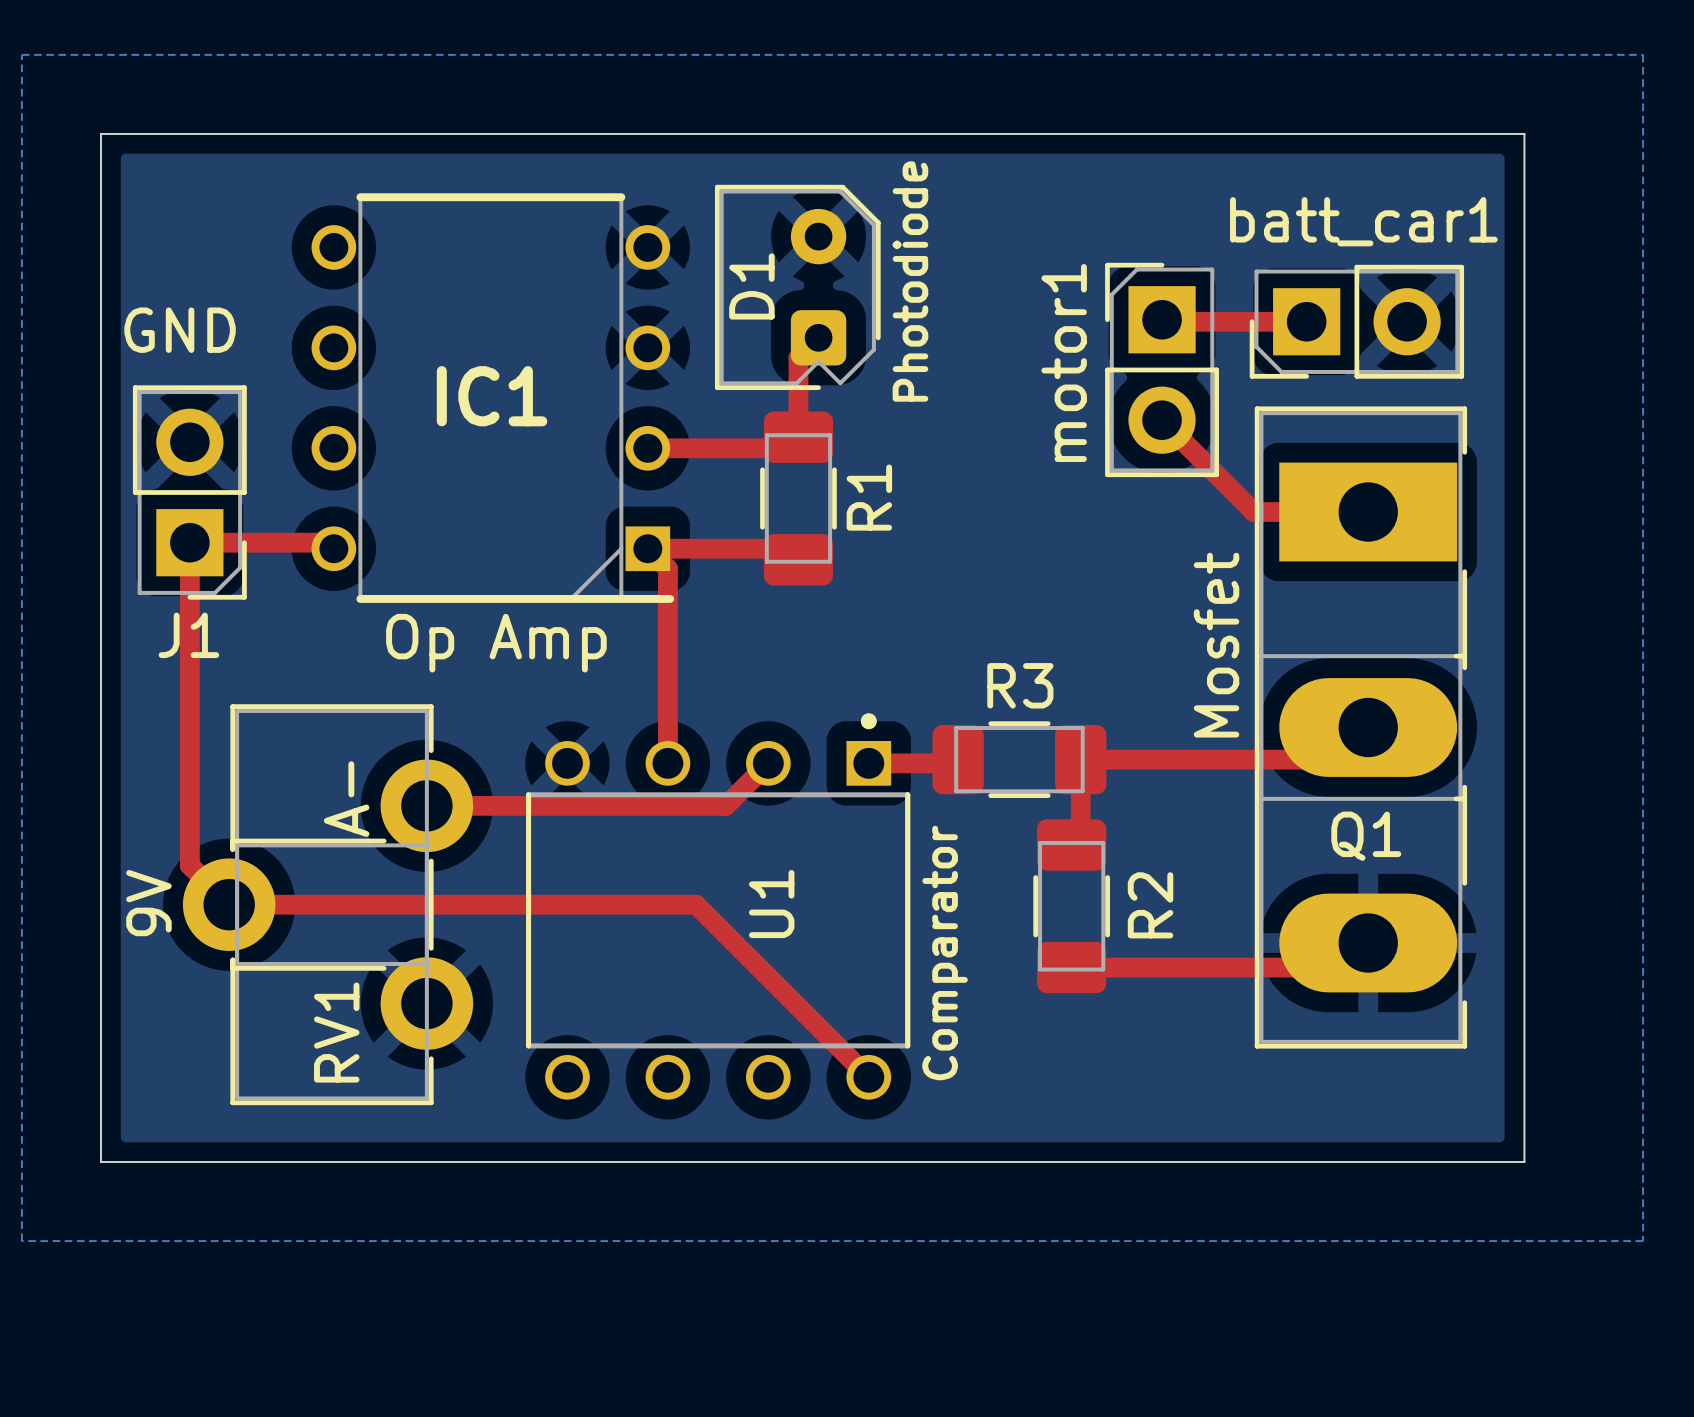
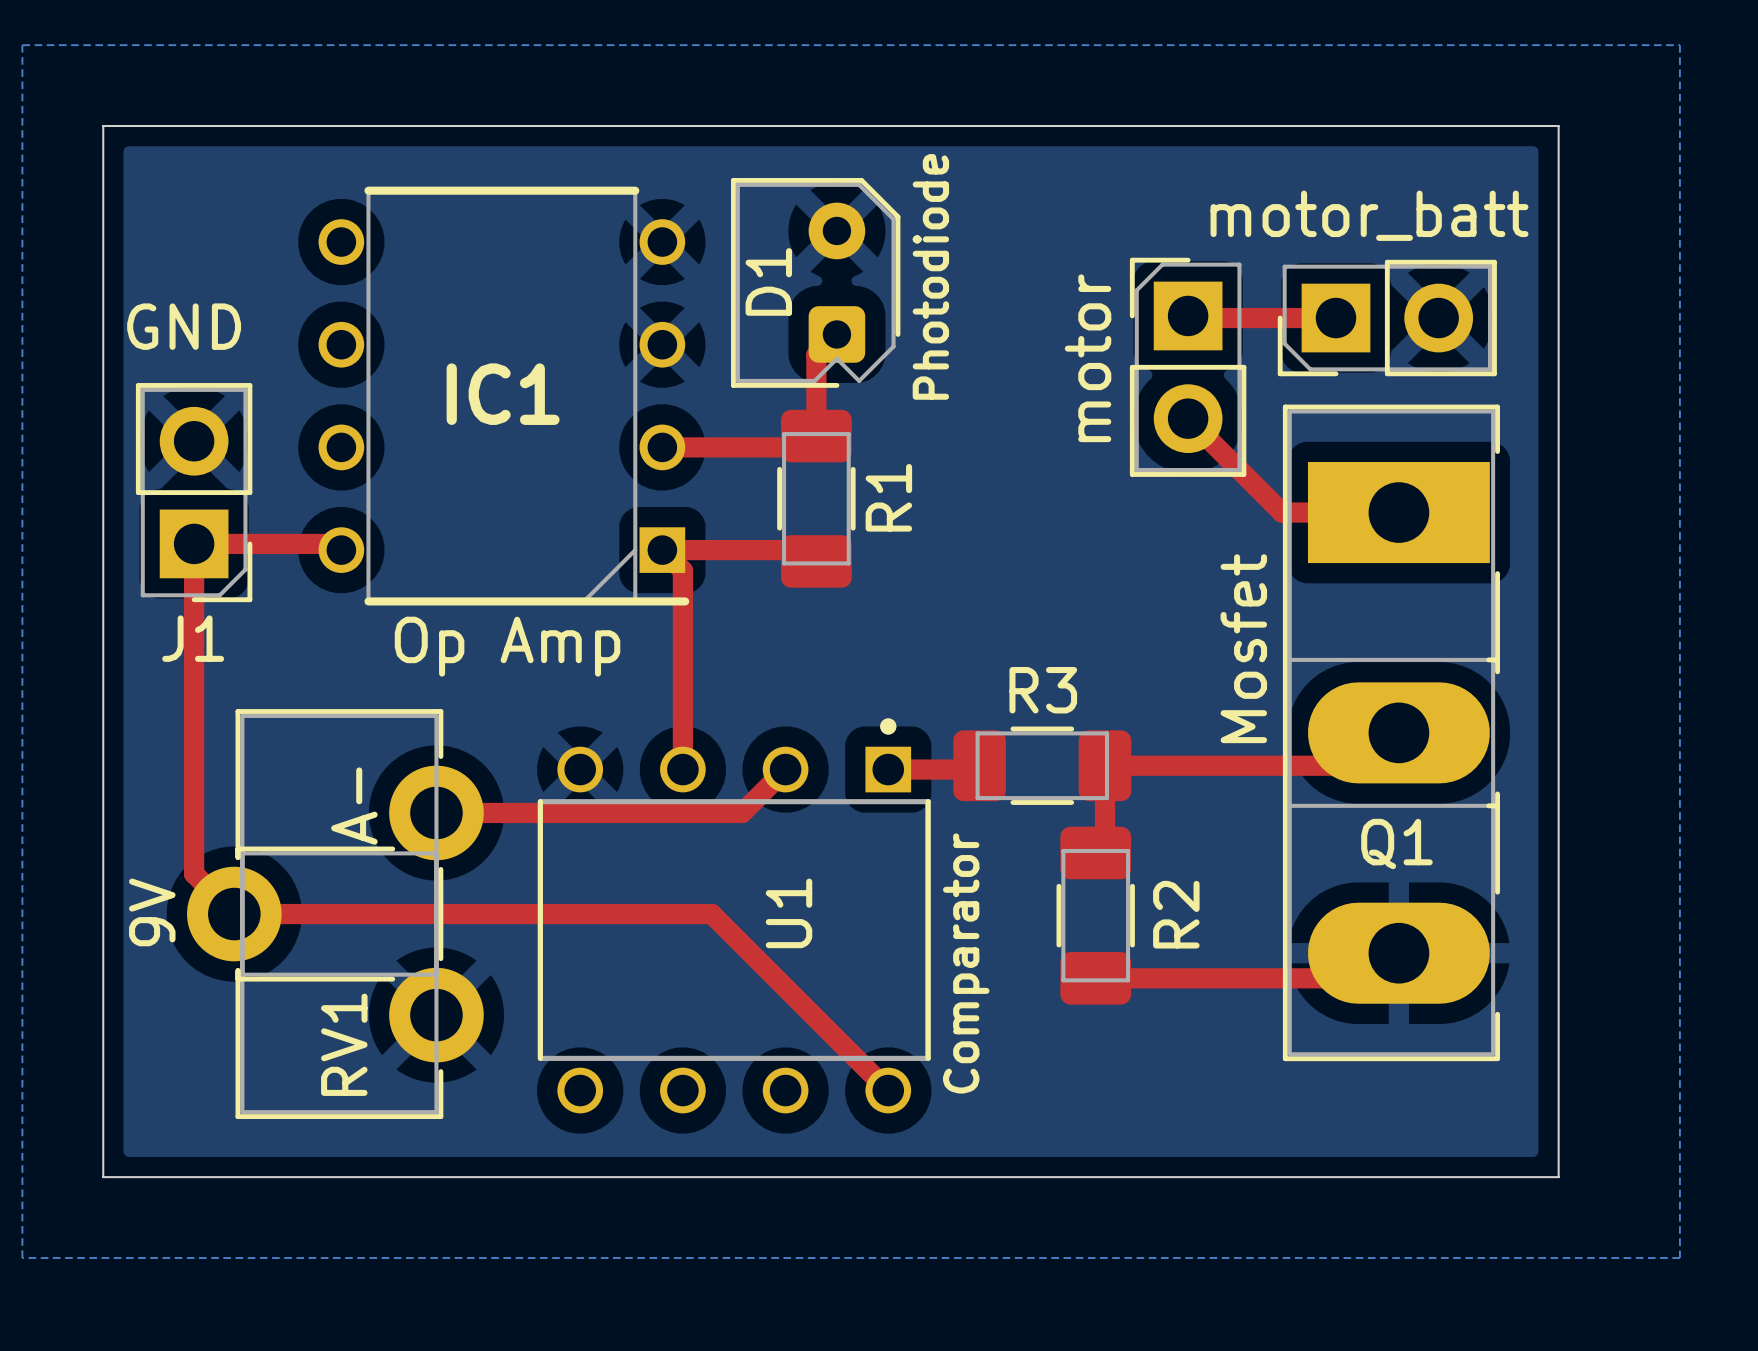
batt_car1 name: batt_car1 (1363, 221) -> motor_batt (1369, 215)
motor1 name: motor1 (1064, 362) -> motor (1088, 358)

